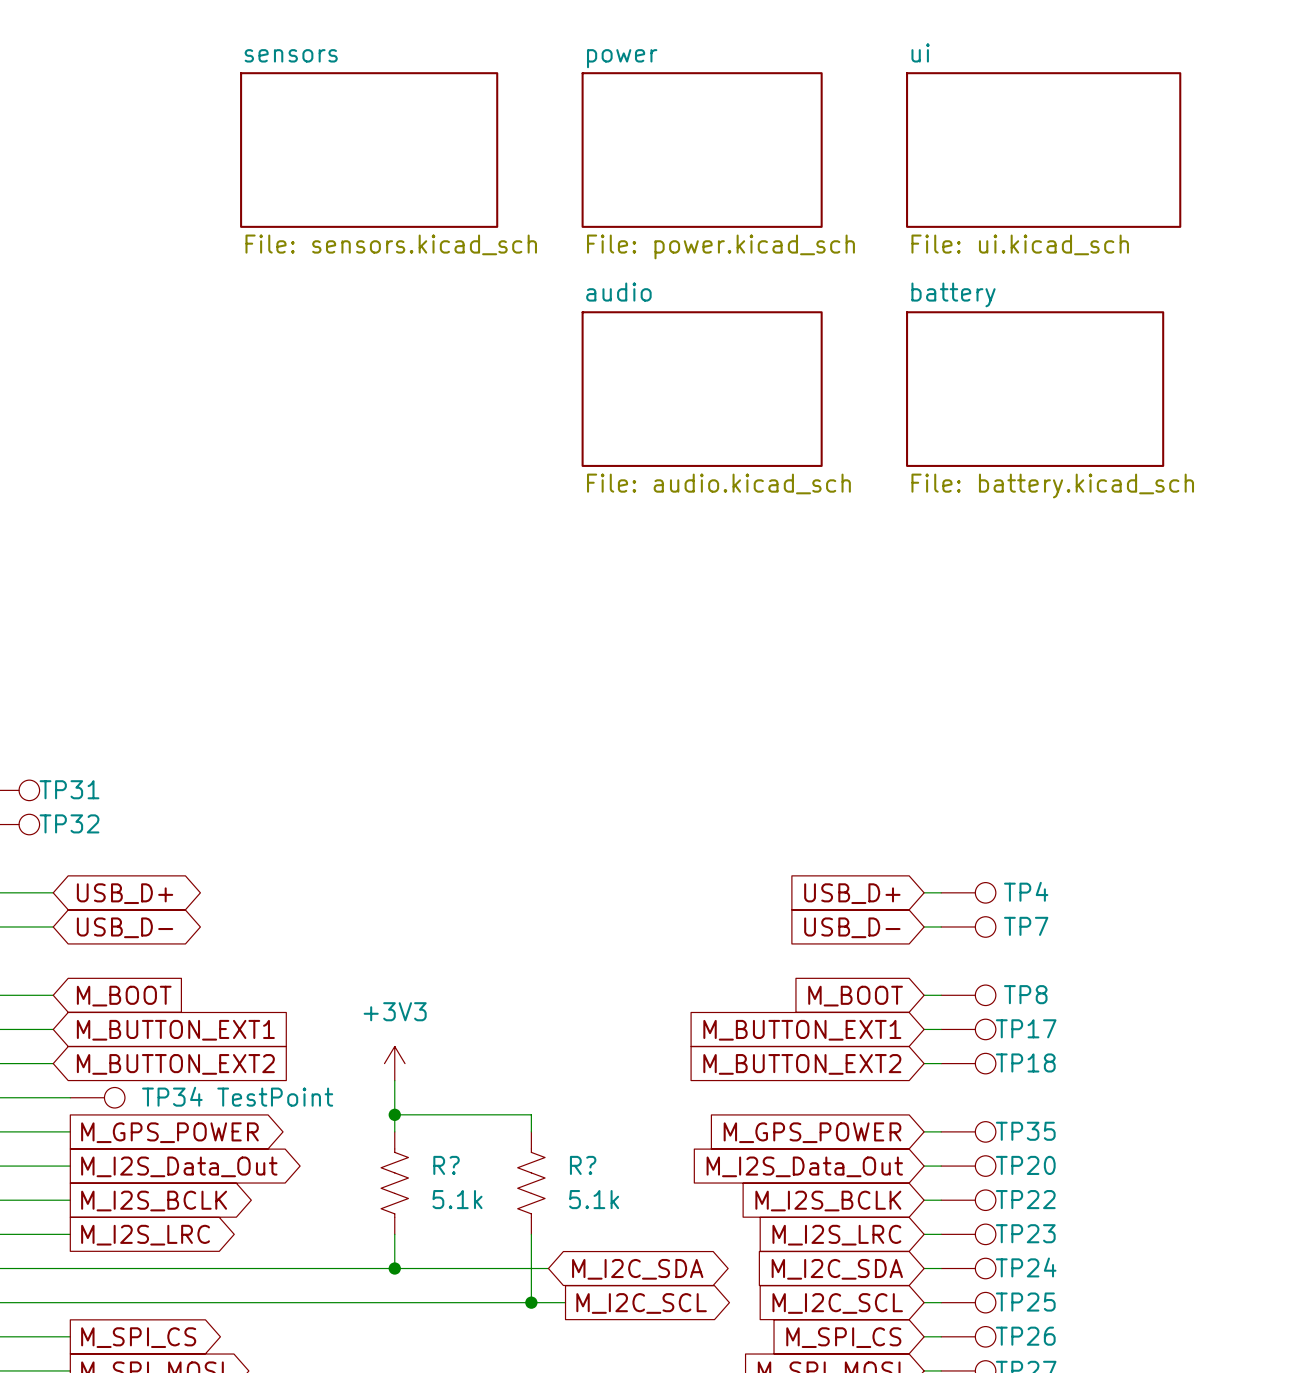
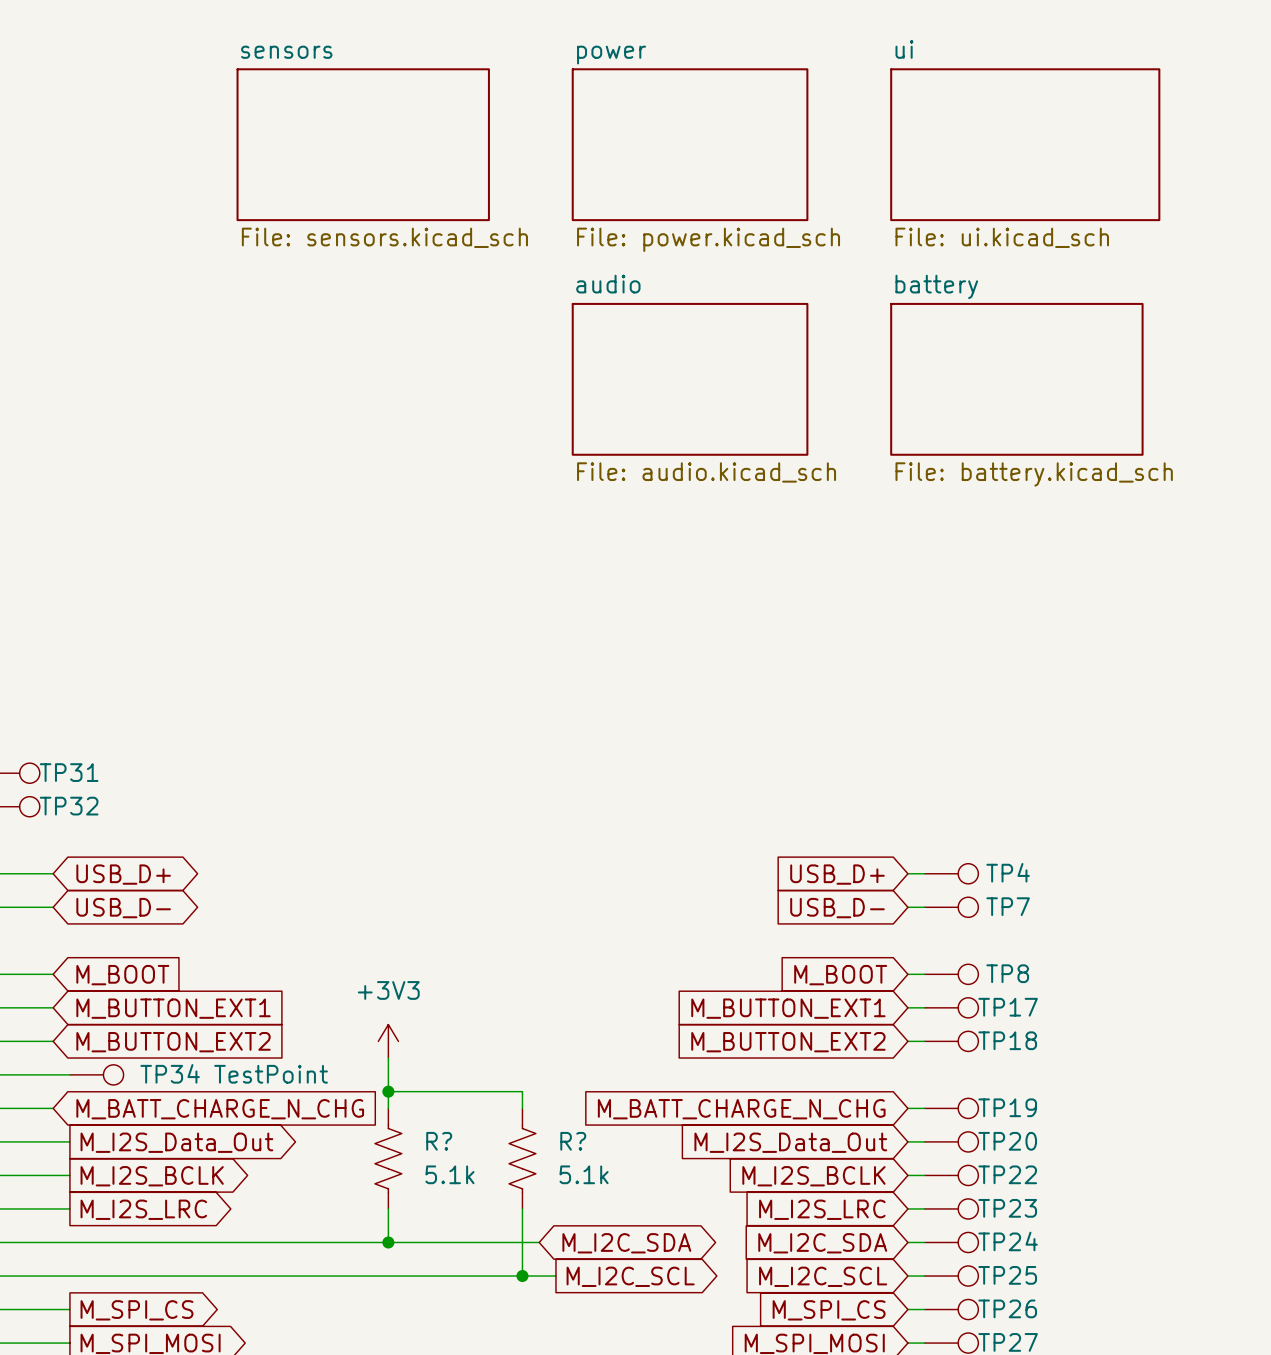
wire: (53, 1131) (70, 1131) -> none
TP35 name: TP35 (1025, 1131) -> TP19 (1007, 1107)
global label: M_GPS_POWER (169, 1132) -> none
global label: none -> M_BATT_CHARGE_N_CHG (220, 1109)
global label: M_GPS_POWER (812, 1132) -> M_BATT_CHARGE_N_CHG (741, 1109)

